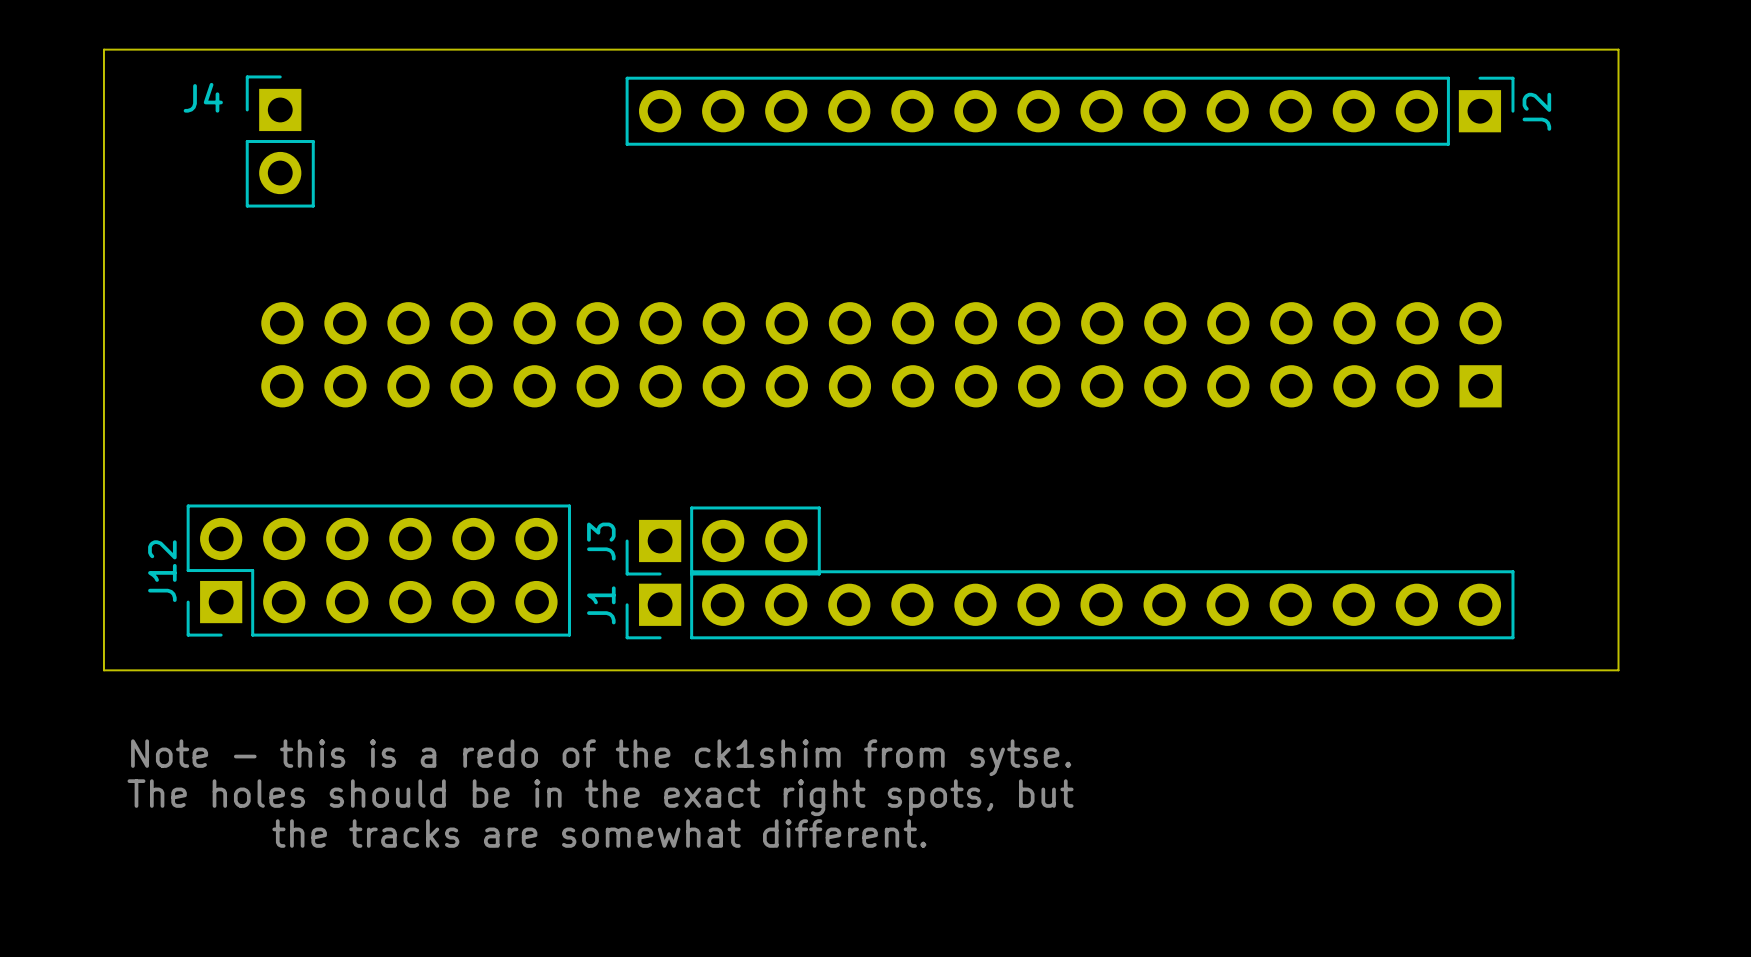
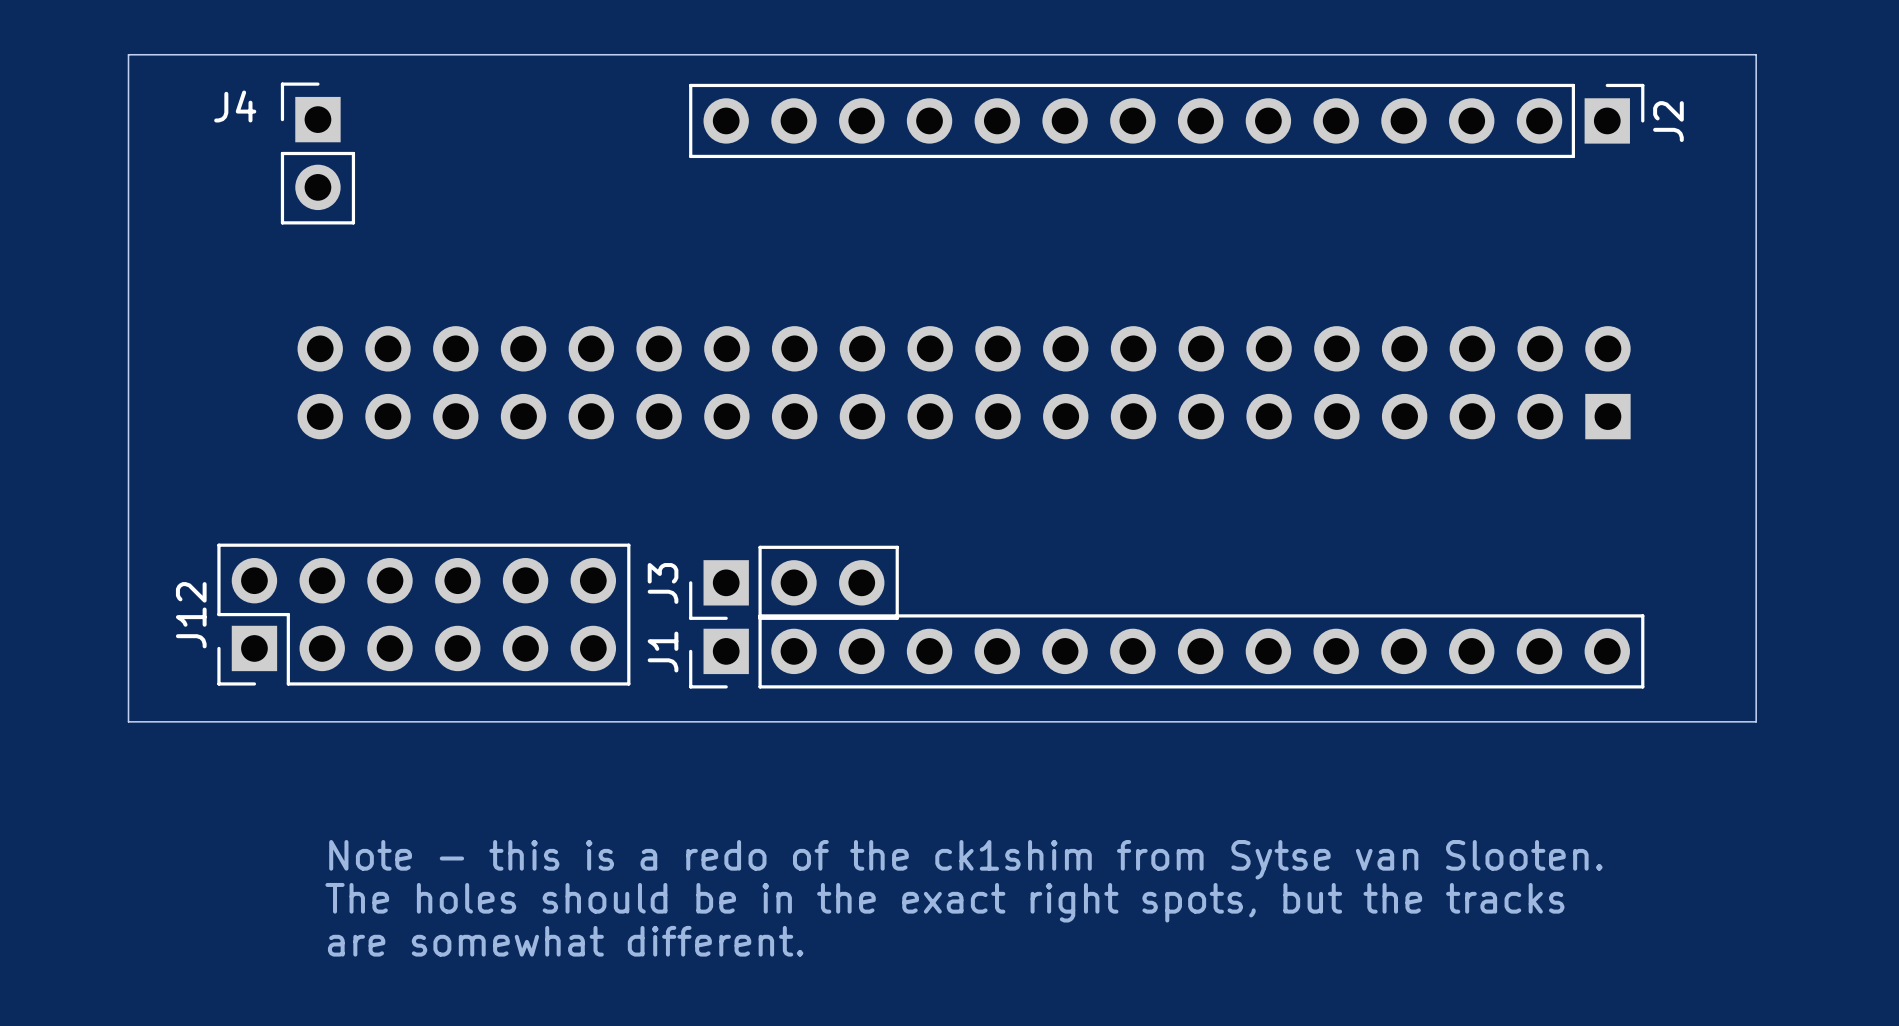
text: Note - this is a redo of the ck1shim from sytse. (601, 757) -> Note - this is a redo of the ck1shim from Sytse van Slooten. (965, 859)
text: The holes should be in the exact right spots, but (600, 797) -> The holes should be in the exact right spots, but the tracks (944, 902)
text: the tracks are somewhat different. (599, 833) -> are somewhat different. (565, 941)

